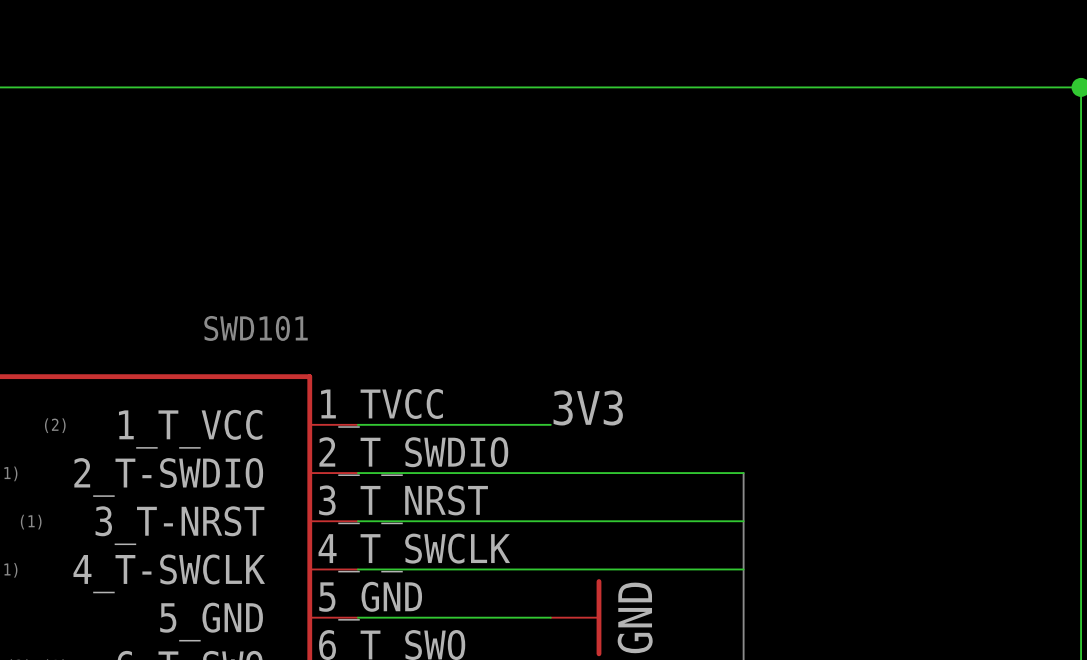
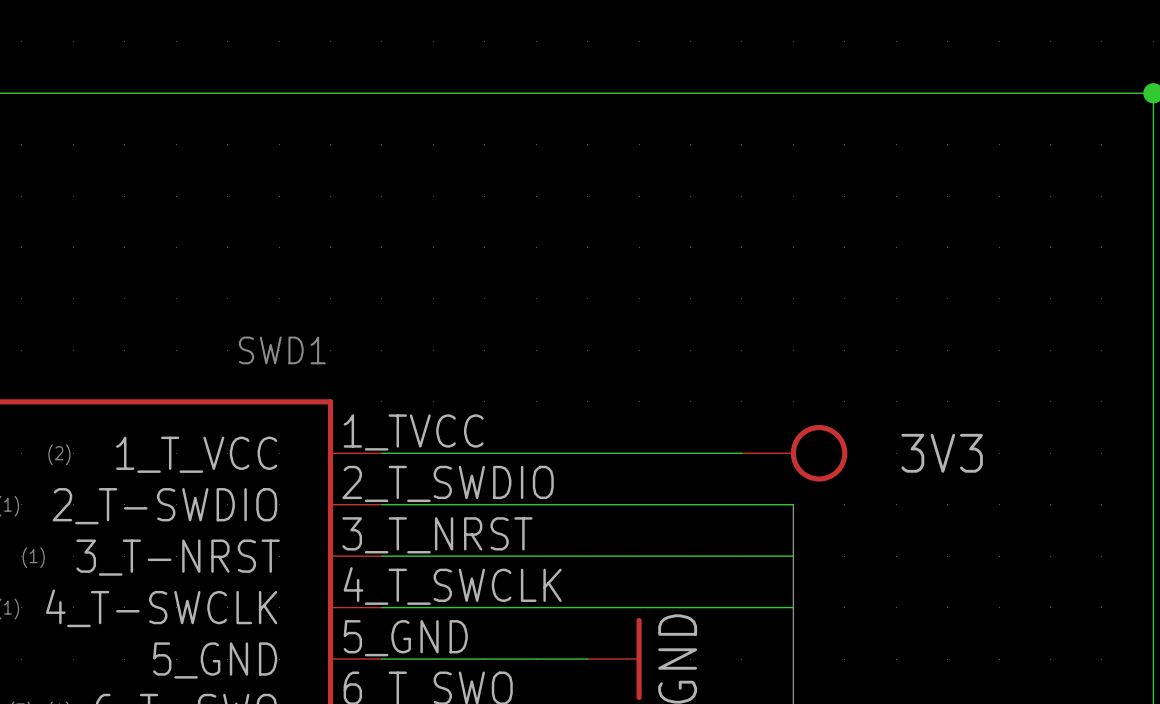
SWD101 name: SWD101 (256, 328) -> SWD1 (282, 350)
label: 3V3 (588, 408) -> none
wire: none -> (587, 453) (741, 453)
power symbol: none -> 3V3 (794, 453)

